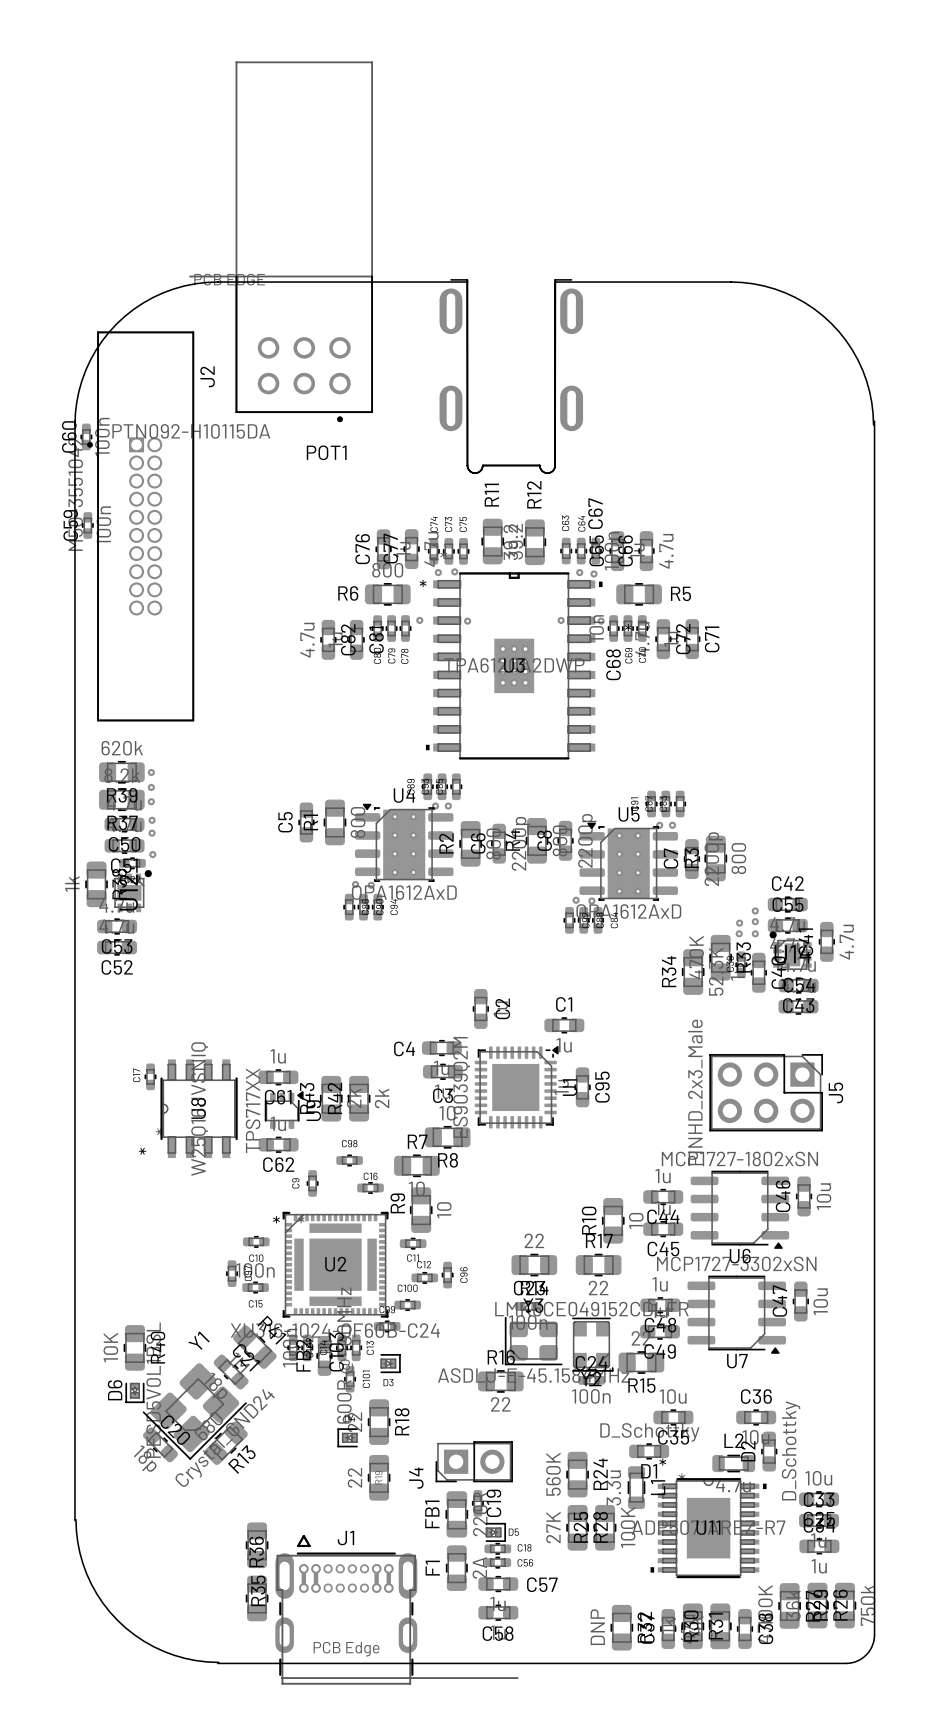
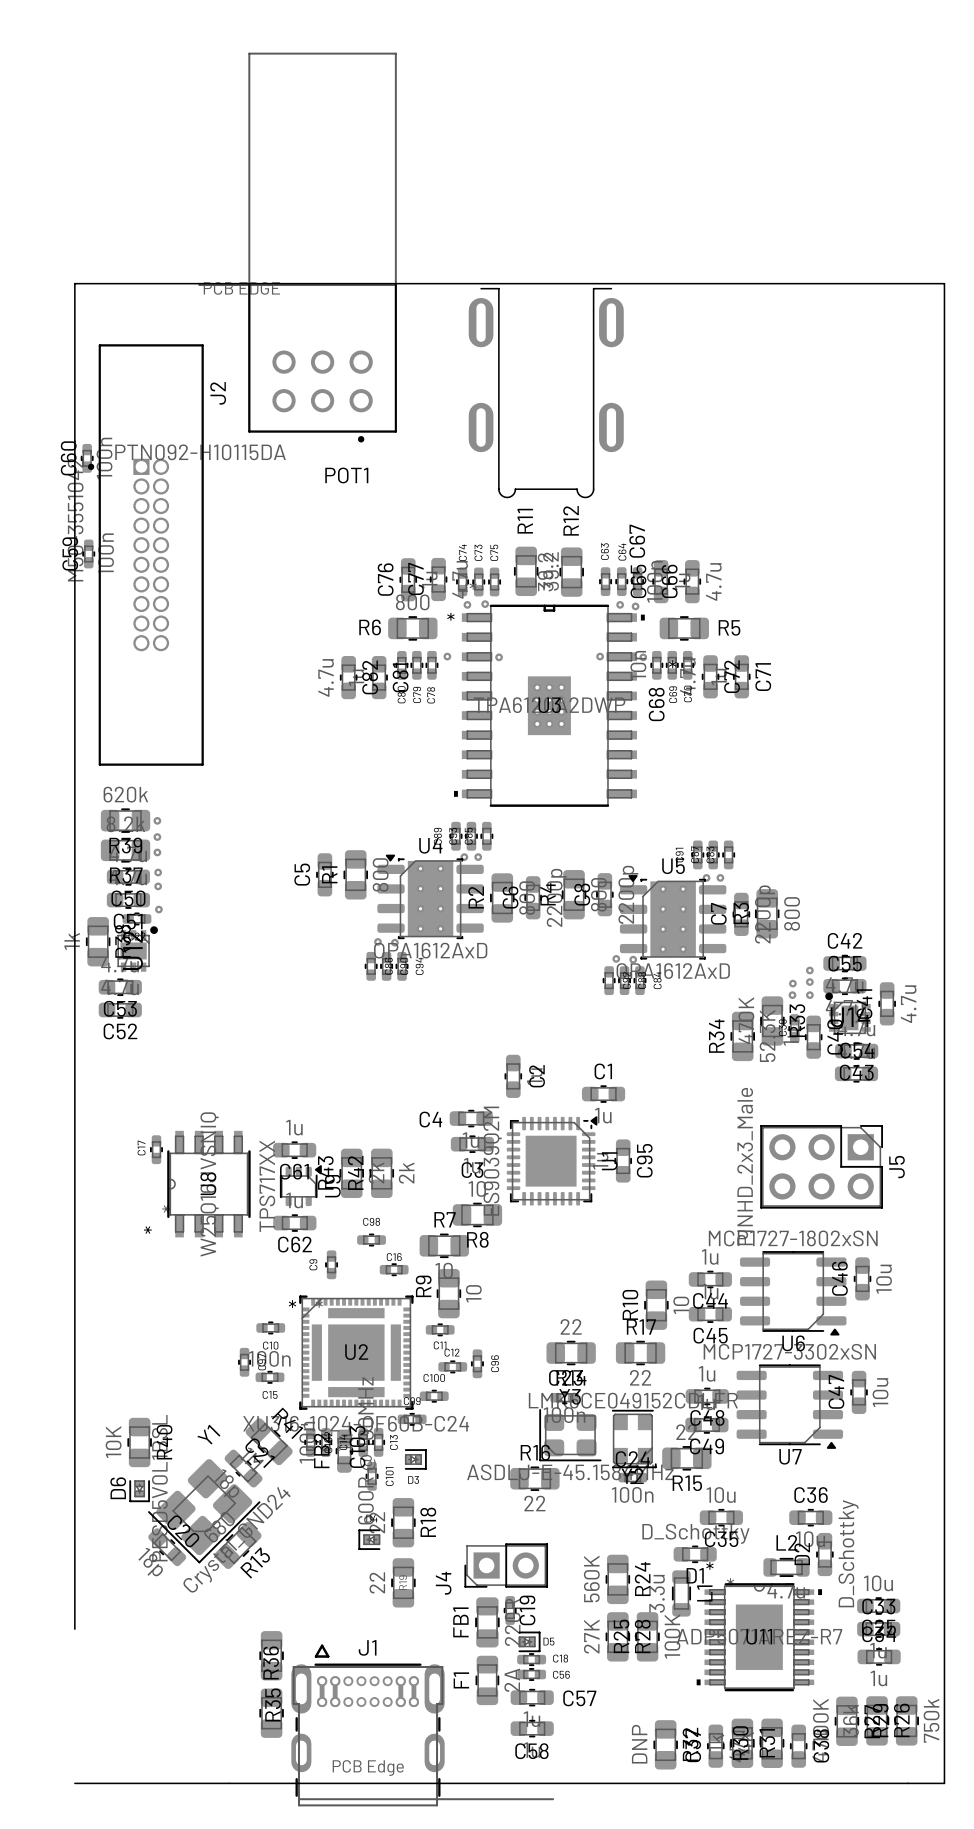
board edge: (467, 281) (467, 465) (472, 472) (479, 471) (482, 465) (539, 465) (542, 470) (547, 473) (554, 468) (555, 282) (741, 282) (764, 285) (785, 292) (814, 309) (831, 323) (846, 340) (857, 359) (866, 380) (871, 402) (873, 424) -> none
board edge: (467, 282) (217, 282) (195, 283) (173, 289) (152, 297) (133, 309) (116, 323) (102, 340) (90, 359) (81, 380) (76, 402) (74, 424) -> none
board edge: (874, 421) (874, 1634) (872, 1644) (866, 1655) (855, 1661) (845, 1663) -> (74, 441) (74, 283) (944, 283) (944, 1783) (907, 1783)
board edge: (75, 1519) (77, 1541) (86, 1574) (97, 1594) (117, 1620) (134, 1635) (164, 1651) (185, 1658) (218, 1662) -> none
board edge: none -> (74, 1783) (229, 1783)

